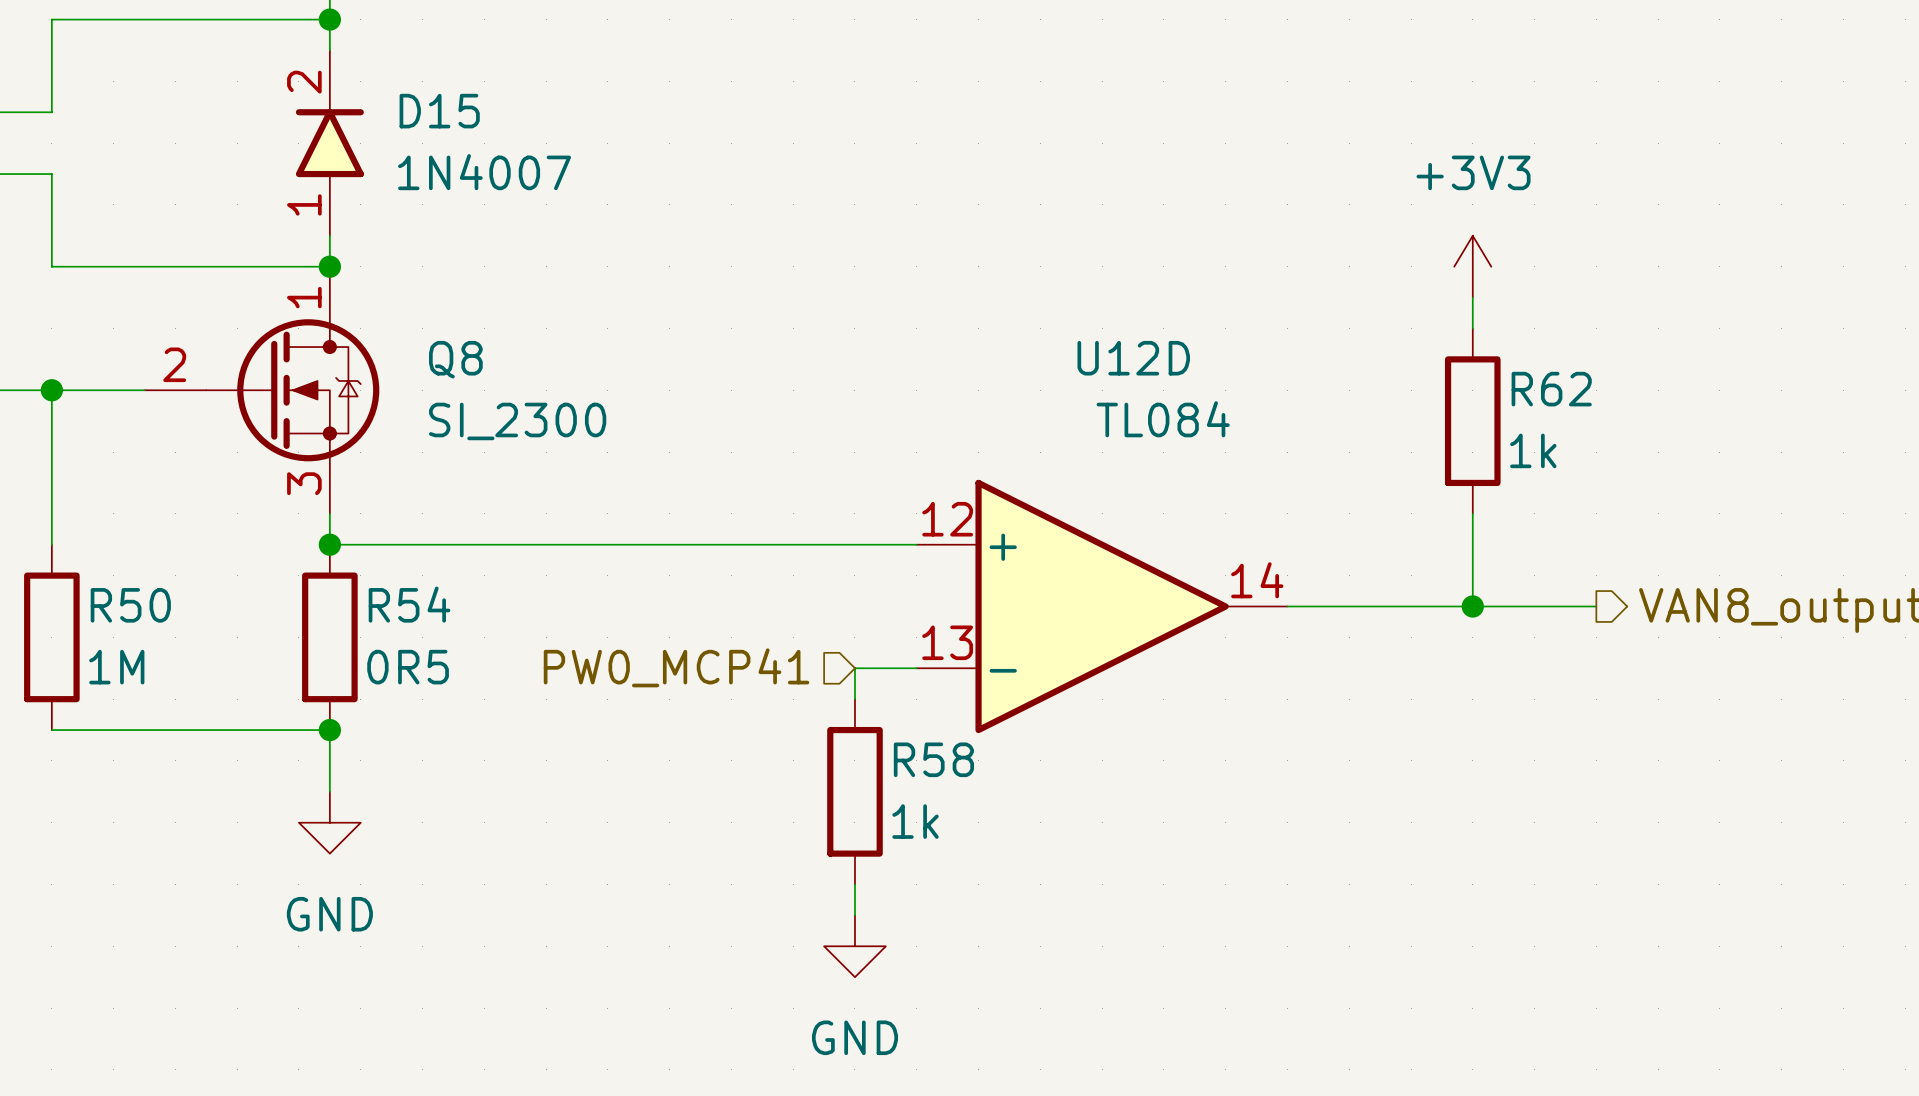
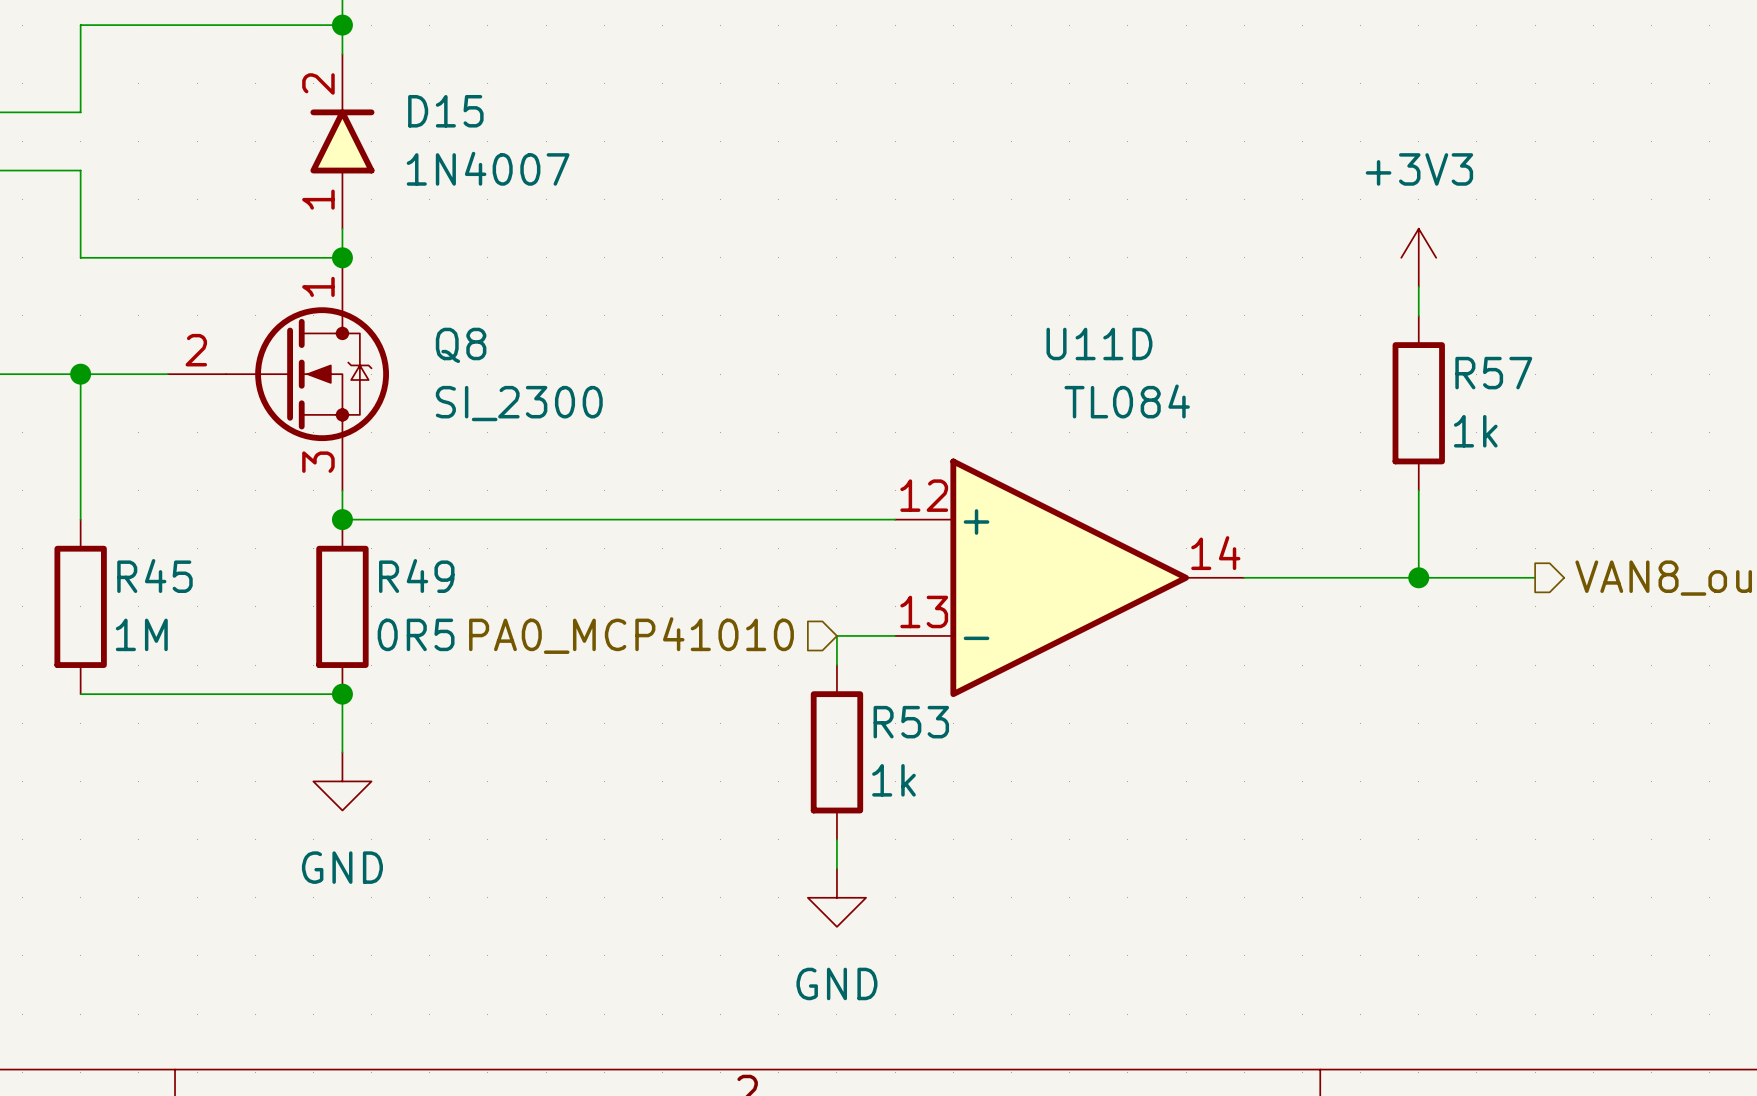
U12D name: U12D (1133, 358) -> U11D (1099, 343)
R62 name: R62 (1551, 389) -> R57 (1493, 373)
R54 name: R54 (409, 604) -> R49 (416, 576)
R50 name: R50 (130, 605) -> R45 (154, 576)
hierarchical label: PW0_MCP41 (676, 667) -> PA0_MCP41010 (631, 635)
R58 name: R58 (933, 759) -> R53 (911, 722)

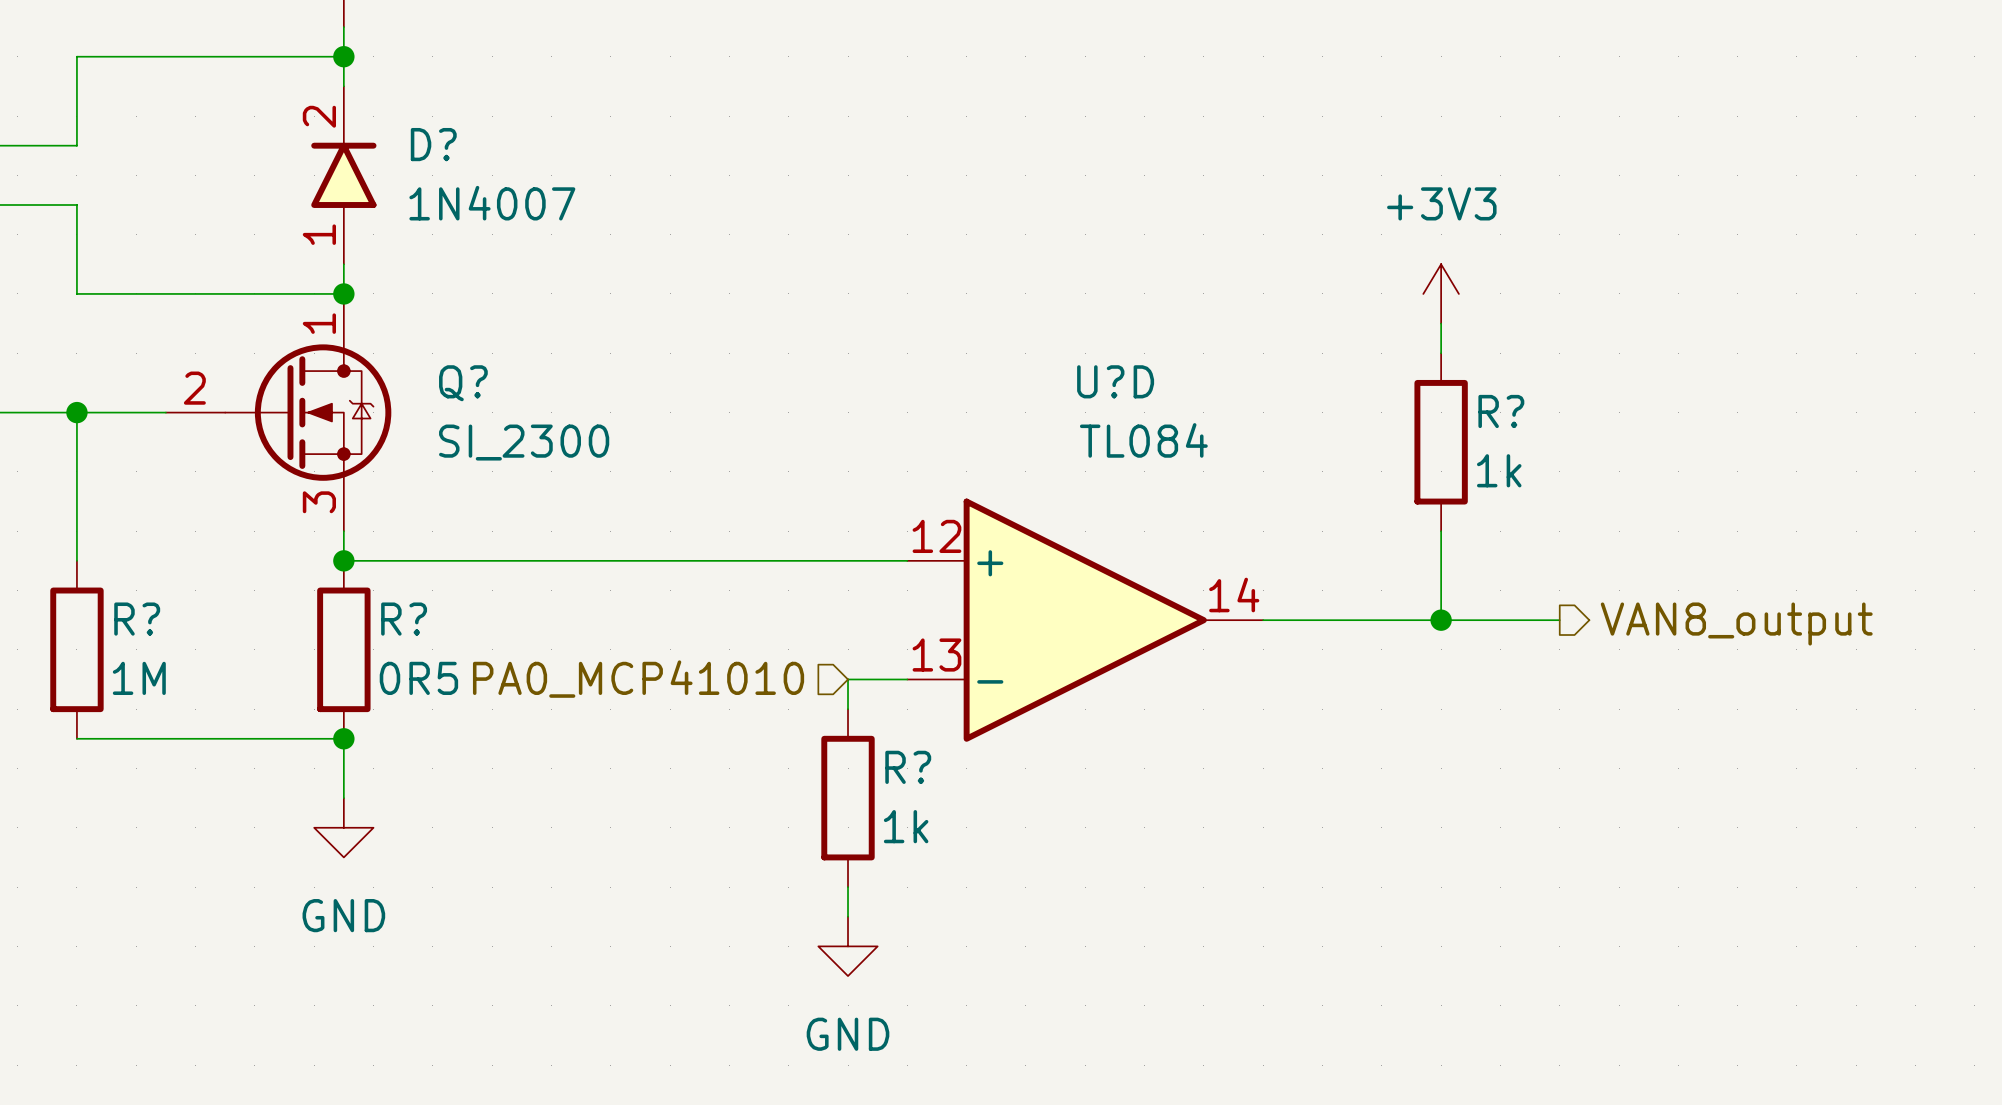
D15 name: D15 (445, 111) -> D? (433, 144)
U11D name: U11D (1099, 343) -> U?D (1115, 381)
Q8 name: Q8 (461, 345) -> Q? (463, 383)
R57 name: R57 (1493, 373) -> R? (1501, 411)
R45 name: R45 (154, 576) -> R? (137, 619)
R49 name: R49 (416, 576) -> R? (404, 619)
R53 name: R53 (911, 722) -> R? (908, 767)

